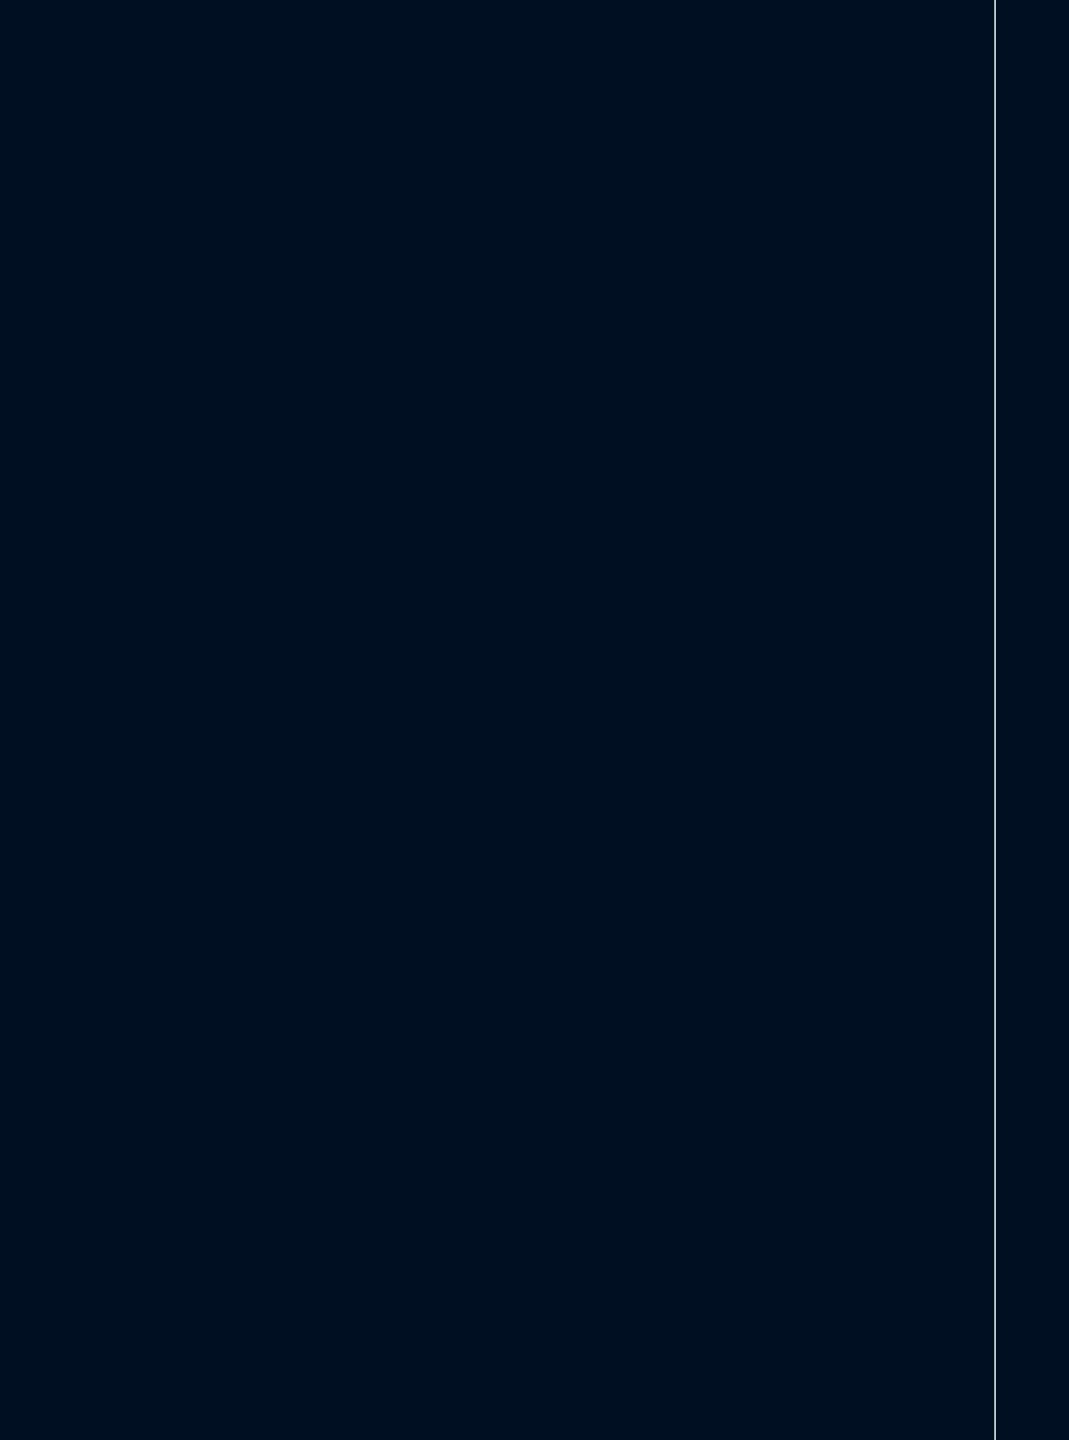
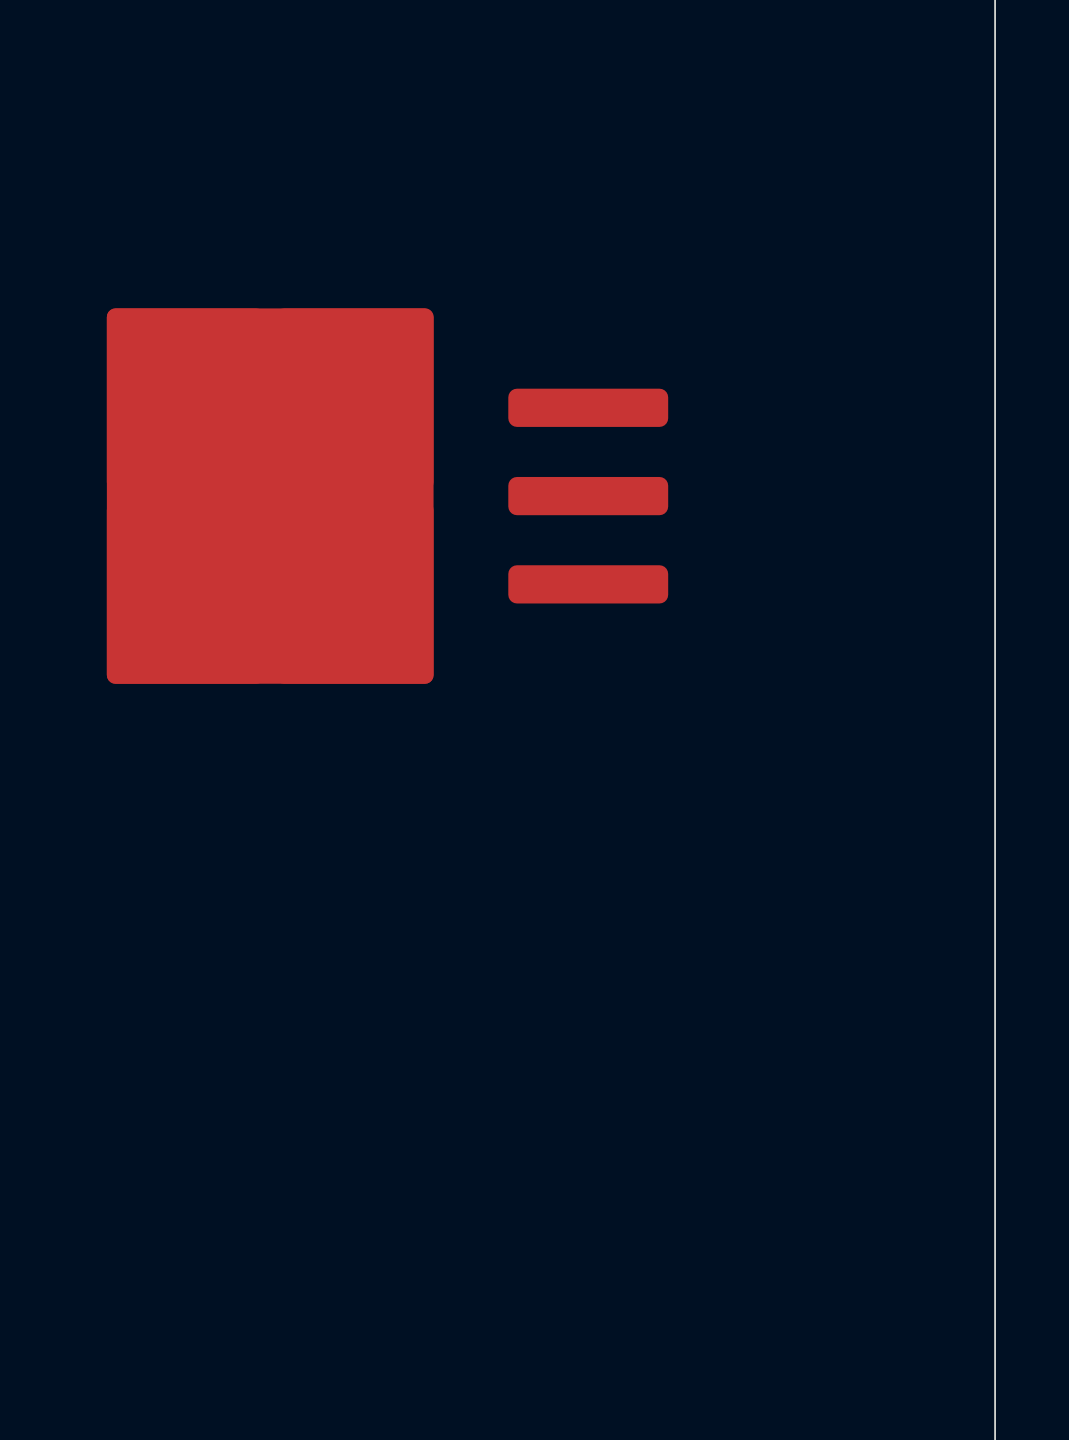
part: none -> (387, 496)

